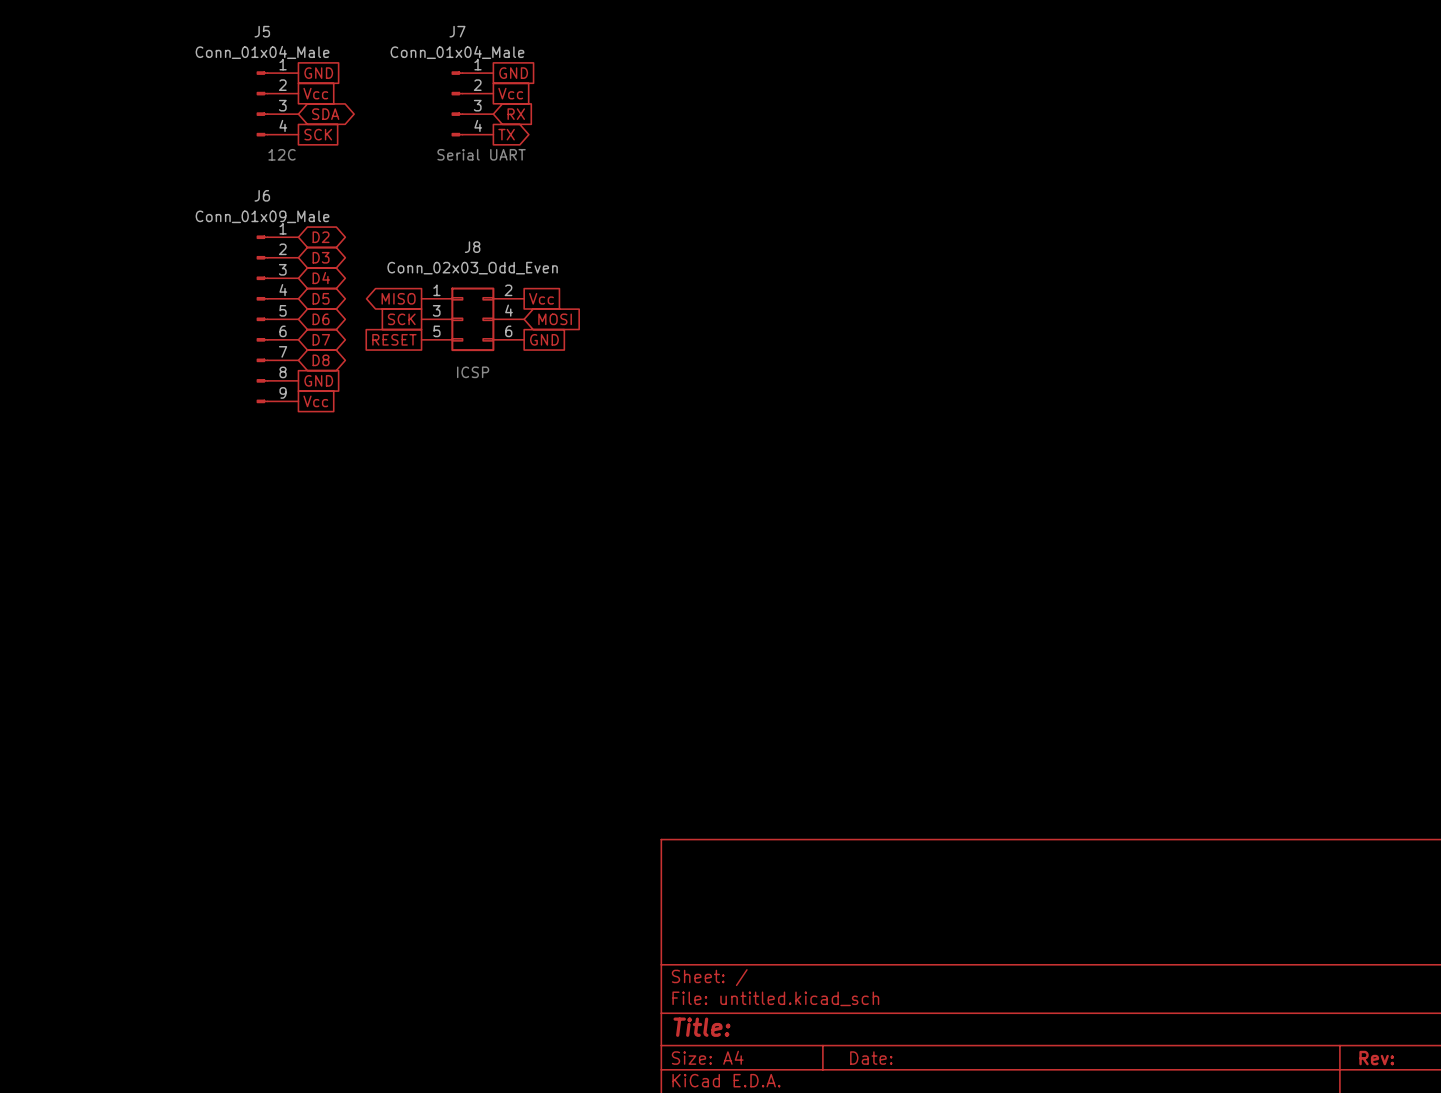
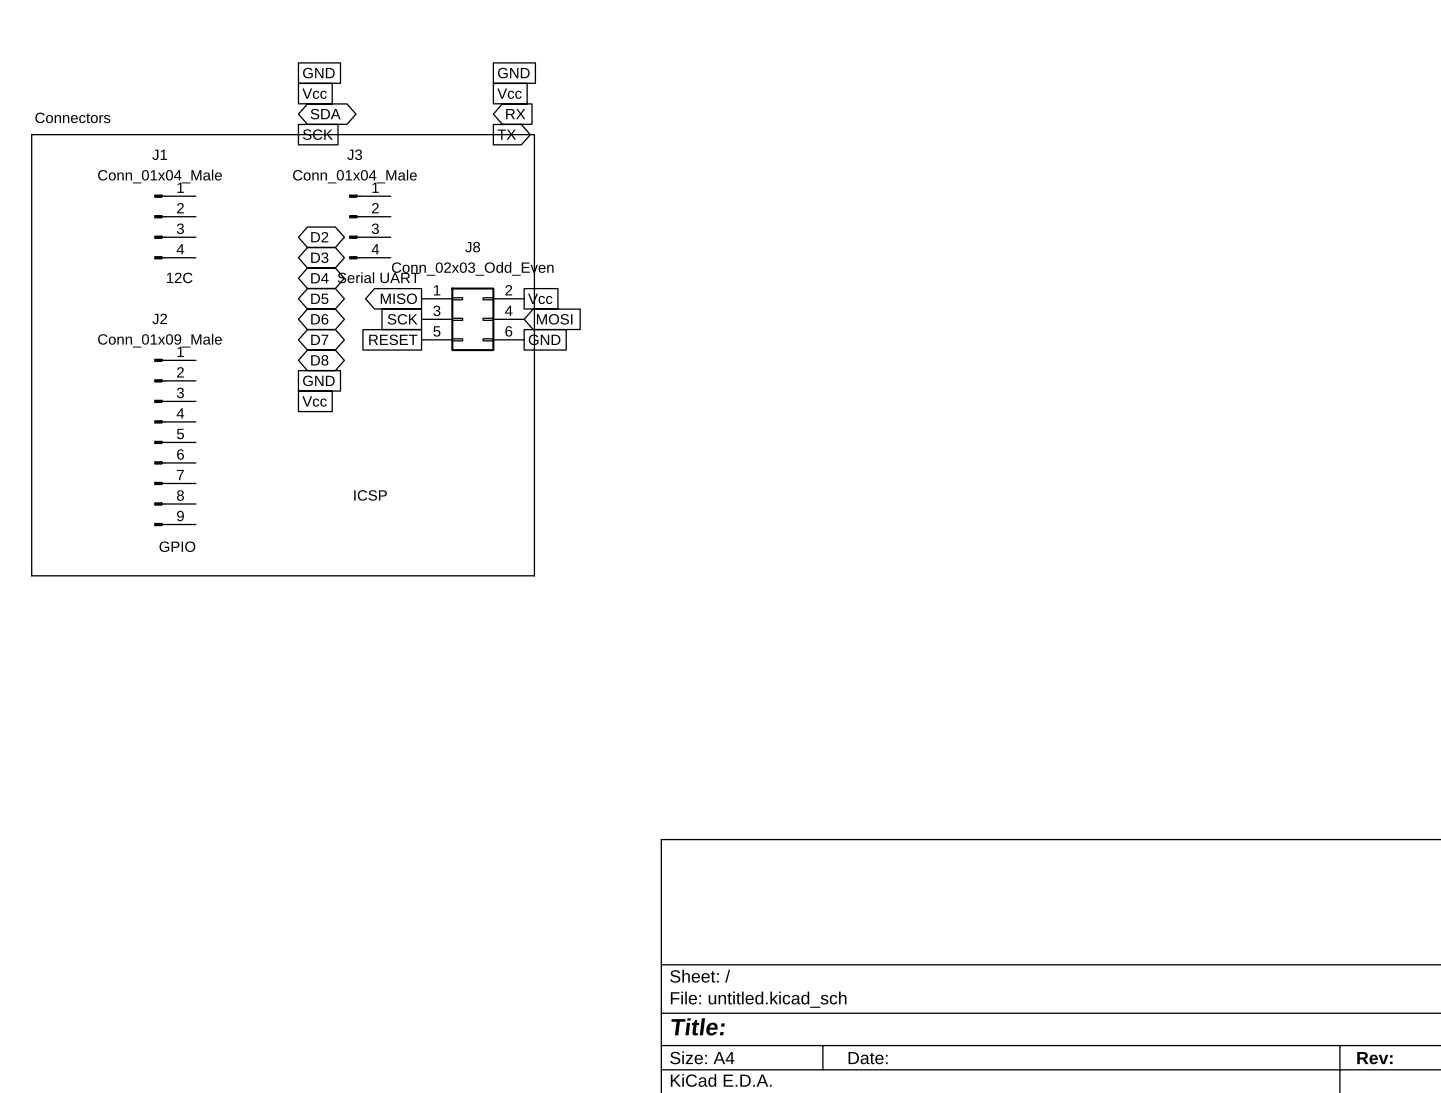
J5: Conn_01x04_Male (277, 103) -> none
J7: Conn_01x04_Male (472, 103) -> none
text: none -> Connectors (72, 117)
line: none -> (31, 134) (534, 134) (534, 575) (31, 575) (31, 134)
text position: 12C (282, 154) -> 12C (179, 277)
text position: Serial UART (481, 154) -> Serial UART (378, 277)
J1: none -> Conn_01x04_Male (175, 226)
J3: none -> Conn_01x04_Male (369, 226)
J6: Conn_01x09_Male (277, 319) -> none
text position: ICSP (473, 372) -> ICSP (370, 495)
J2: none -> Conn_01x09_Male (175, 442)
text: none -> GPIO (177, 546)

